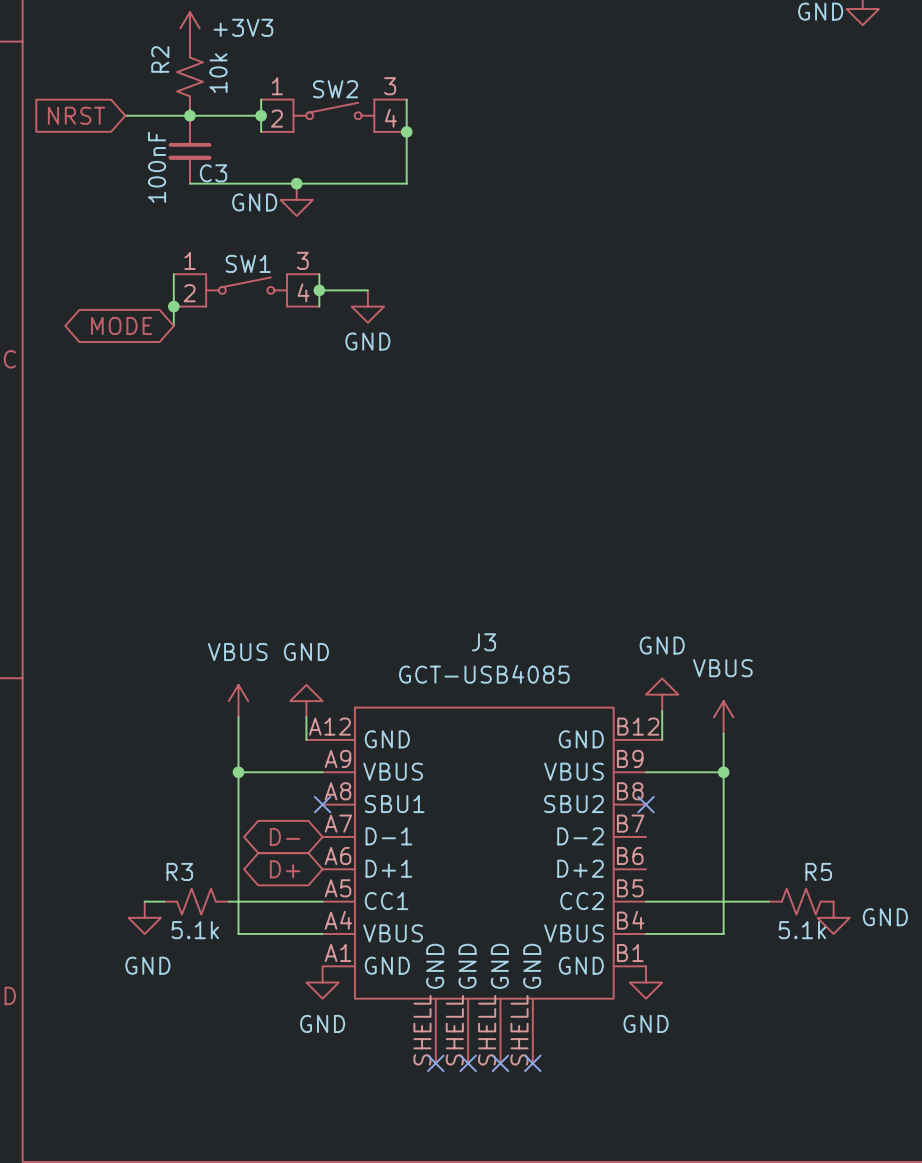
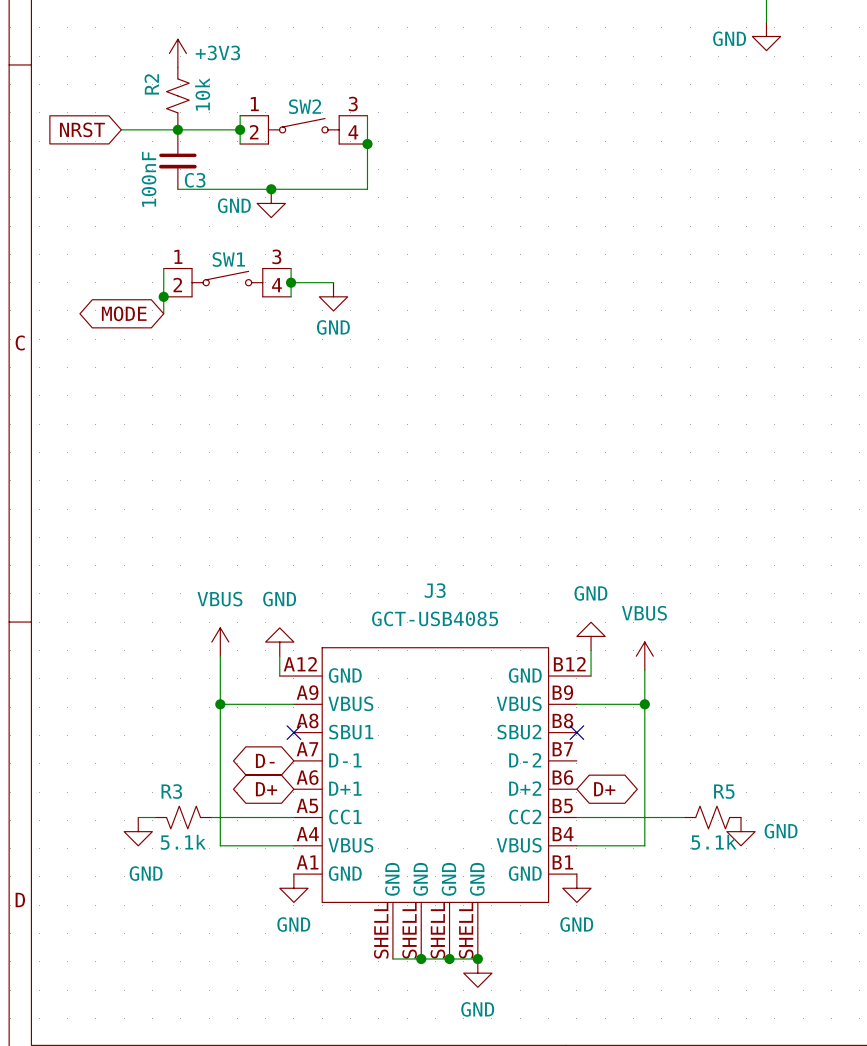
global label: none -> D+ (604, 789)
wire: none -> (392, 959) (477, 959)
no-connect mark: (435, 1063) -> none
no-connect mark: (468, 1063) -> none
junction: none -> (421, 959)
no-connect mark: (500, 1063) -> none
junction: none -> (449, 959)
no-connect mark: (532, 1063) -> none
junction: none -> (477, 959)
power symbol: none -> GND (477, 973)

